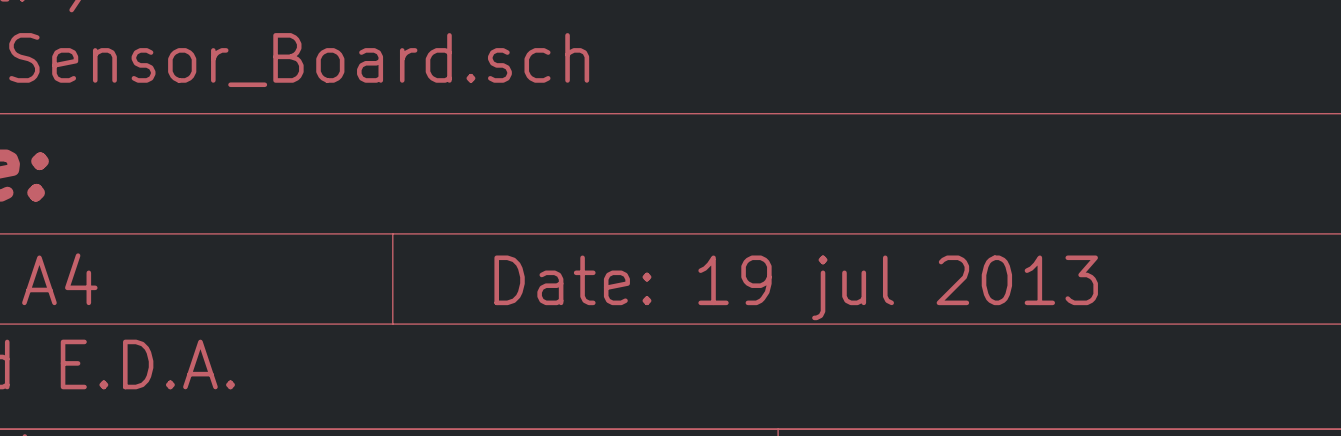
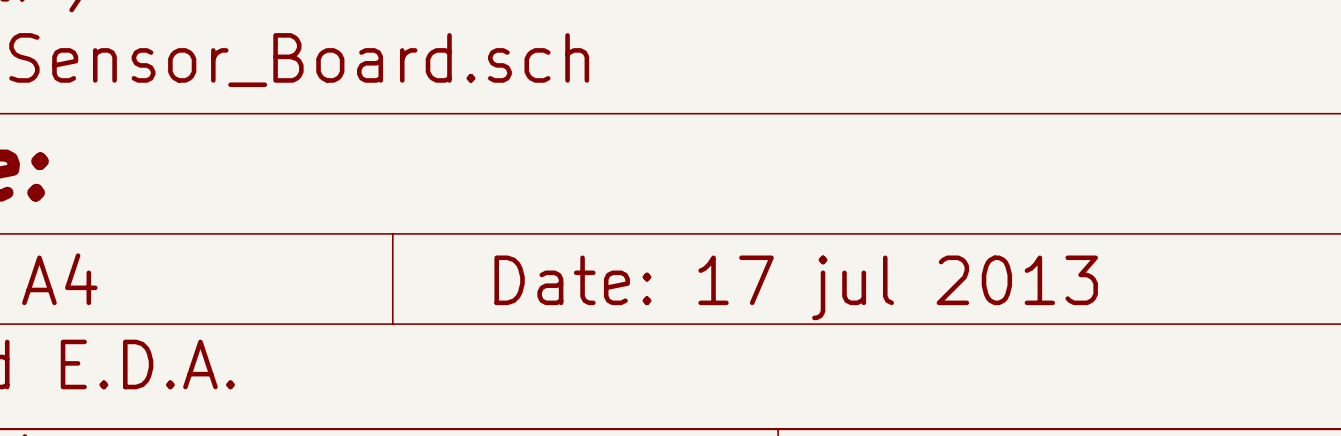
title block: Date: 19 jul 2013 (796, 287) -> Date: 17 jul 2013 (796, 287)

